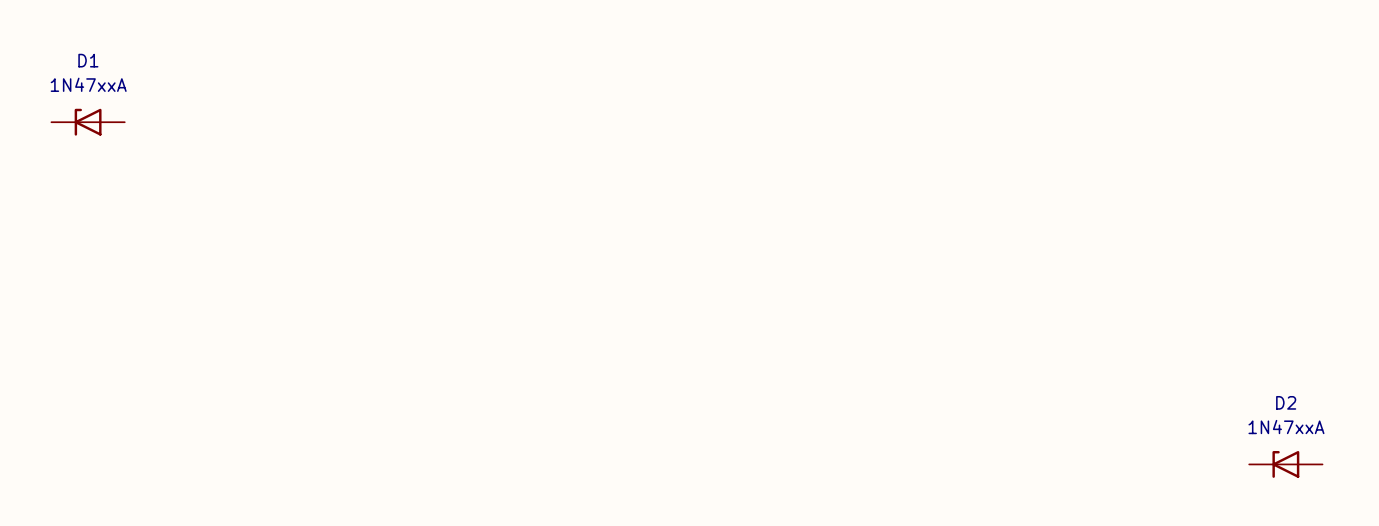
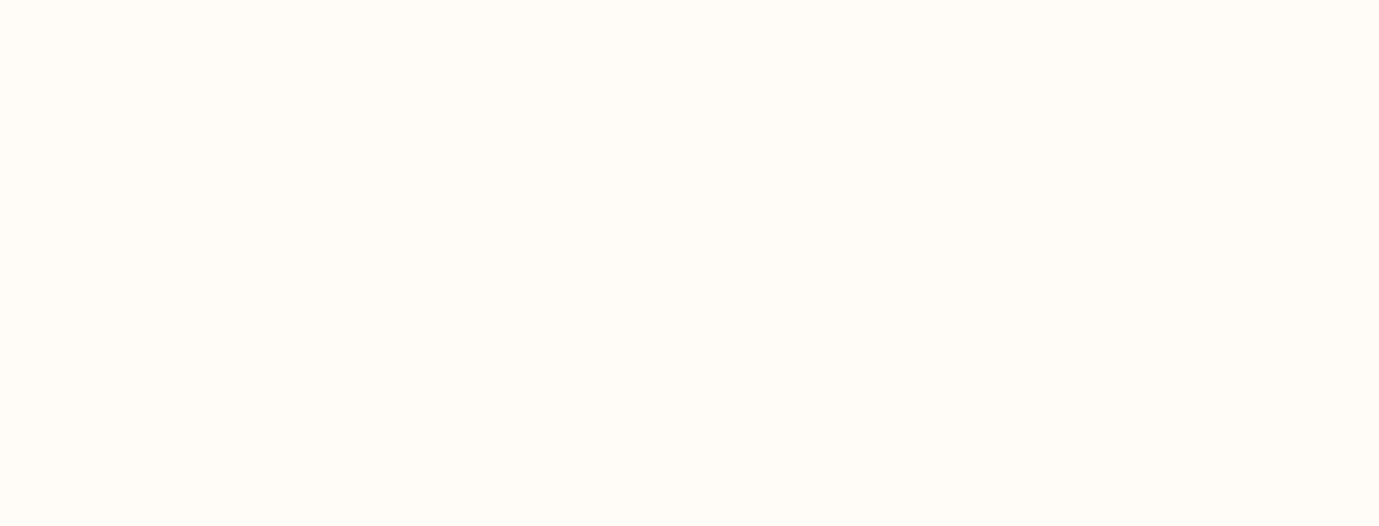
D1: 1N47xxA (88, 122) -> none
D2: 1N47xxA (1285, 464) -> none

